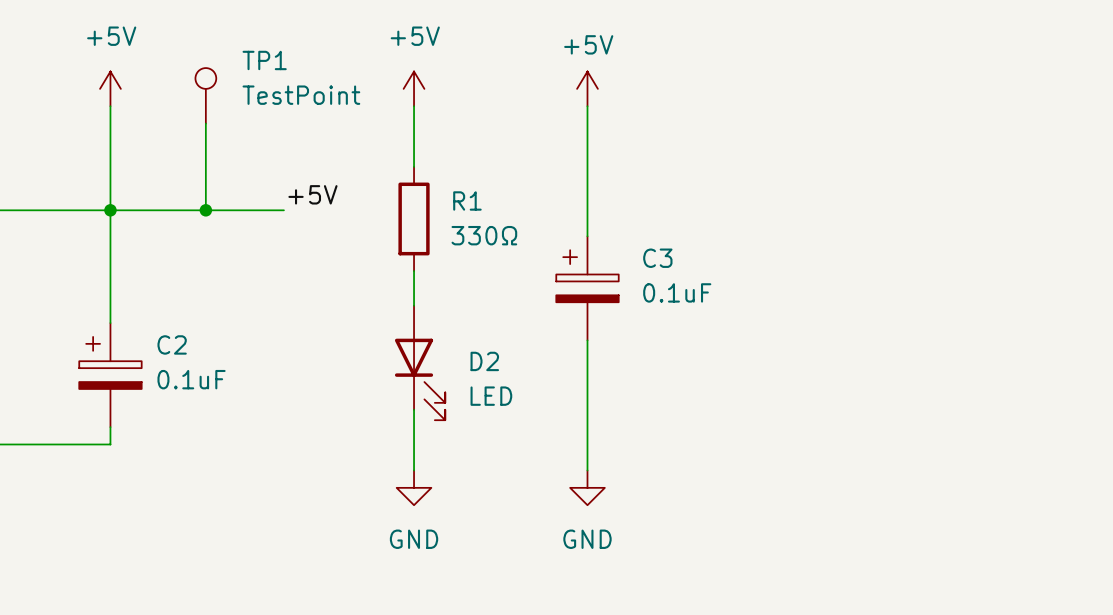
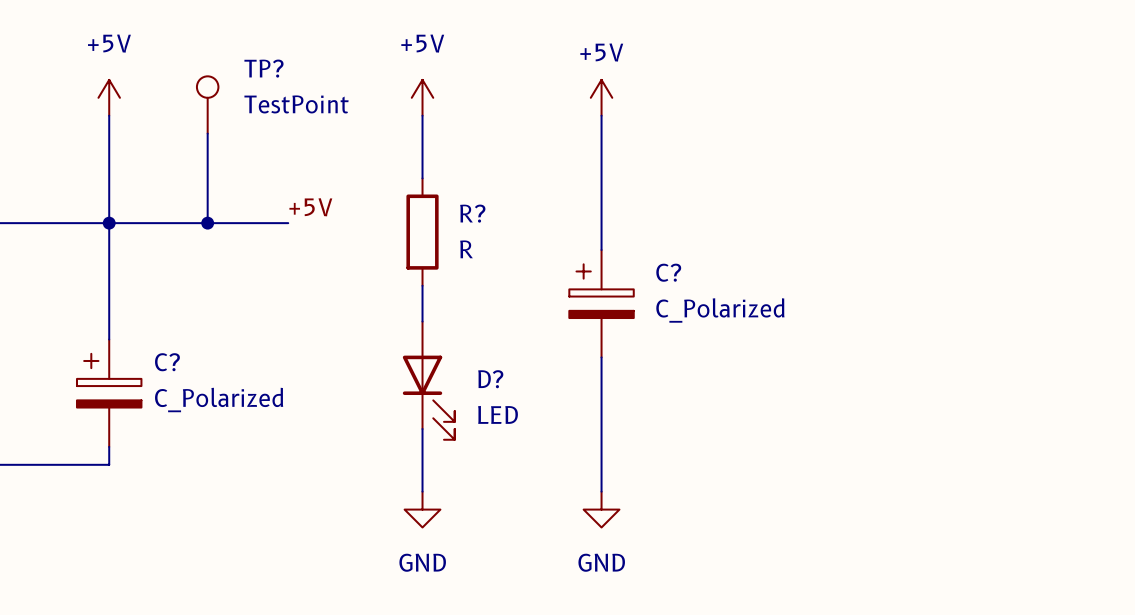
TP1 name: TP1 (264, 60) -> TP? (263, 68)
R1 name: R1 (467, 200) -> R? (472, 213)
R1 value: 330Ω (484, 235) -> R (466, 249)
C3 name: C3 (657, 258) -> C? (668, 272)
C3 value: 0.1uF (677, 292) -> C_Polarized (720, 310)
C2 name: C2 (172, 344) -> C? (167, 362)
D2 name: D2 (484, 361) -> D? (490, 379)
C2 value: 0.1uF (191, 379) -> C_Polarized (219, 400)

